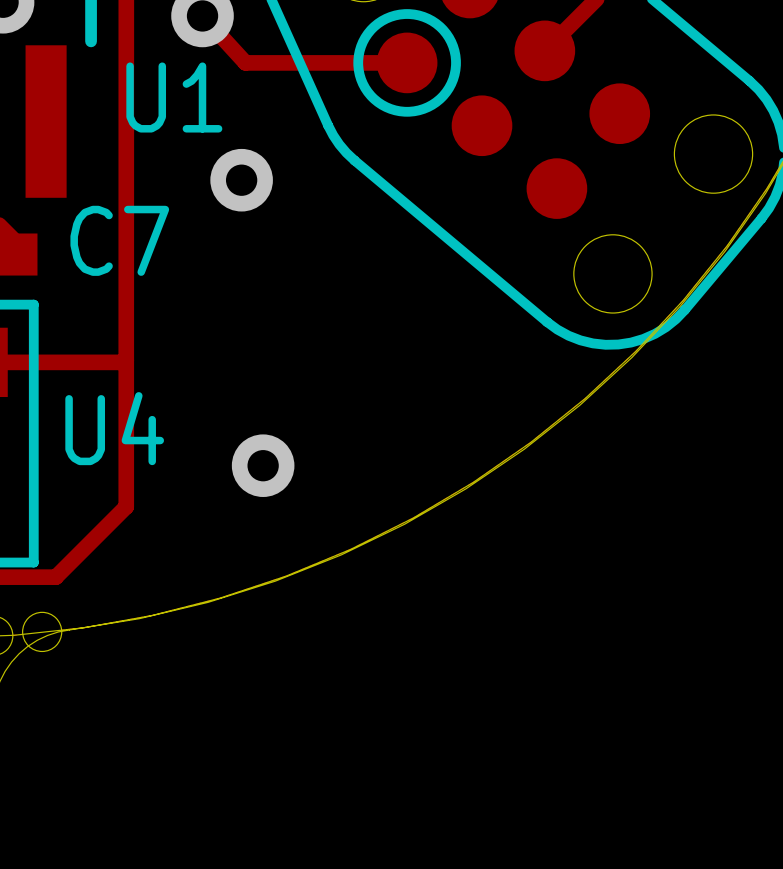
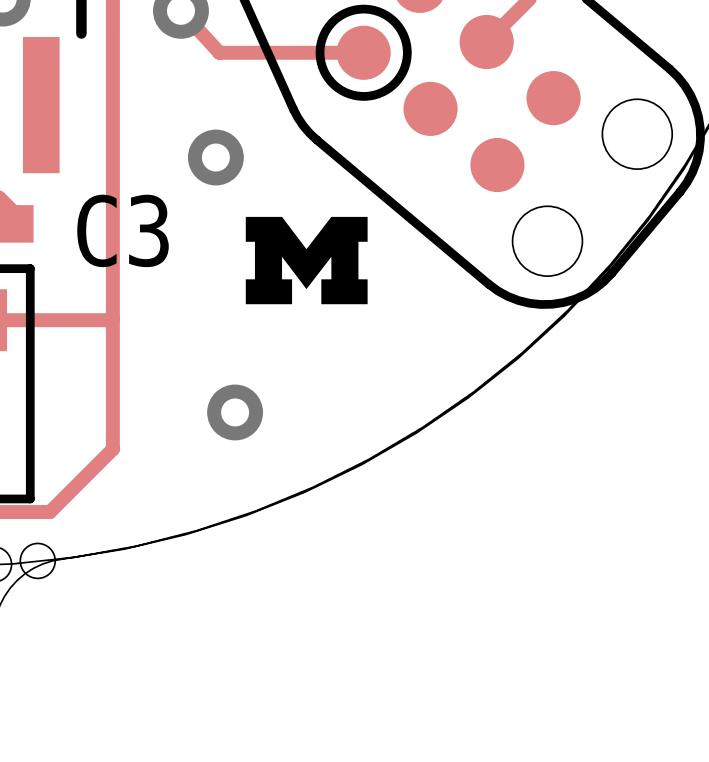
text: U1 (174, 97) -> none
C7 name: C7 (119, 240) -> C3 (123, 230)
drawing: none -> [245, 216, 368, 305]
text: U4 (114, 428) -> none

